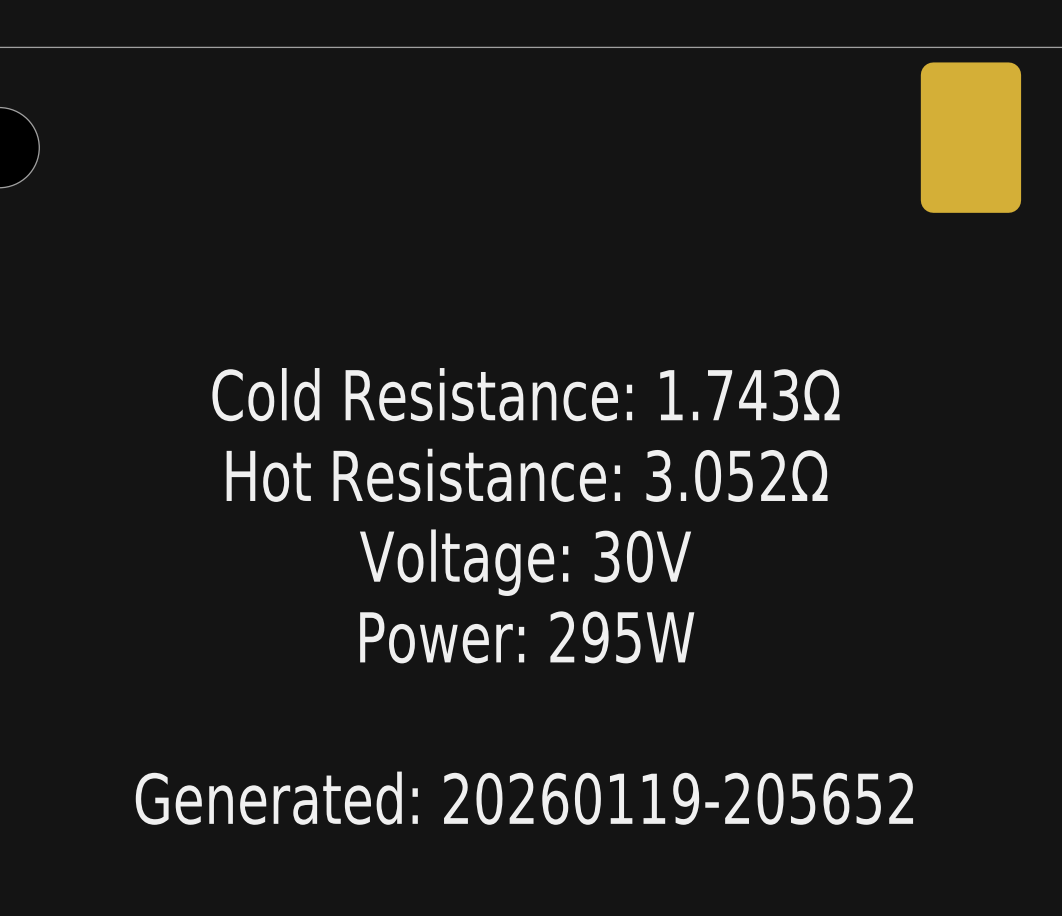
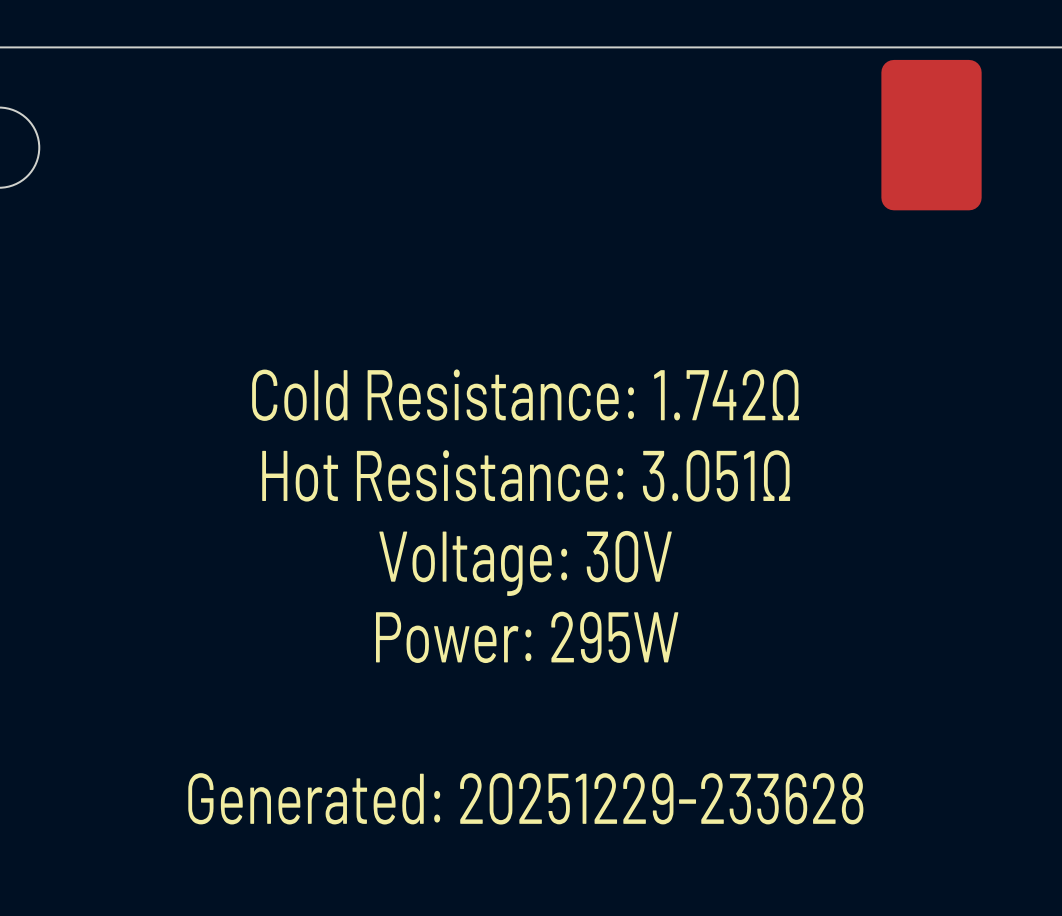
part position: (970, 137) -> (931, 135)
text: Cold Resistance: 1.743Ω (526, 394) -> Cold Resistance: 1.742Ω (525, 395)
text: Hot Resistance: 3.052Ω (527, 475) -> Hot Resistance: 3.051Ω (526, 475)
text: Generated: 20260119-205652 (524, 798) -> Generated: 20251229-233628 (525, 798)

